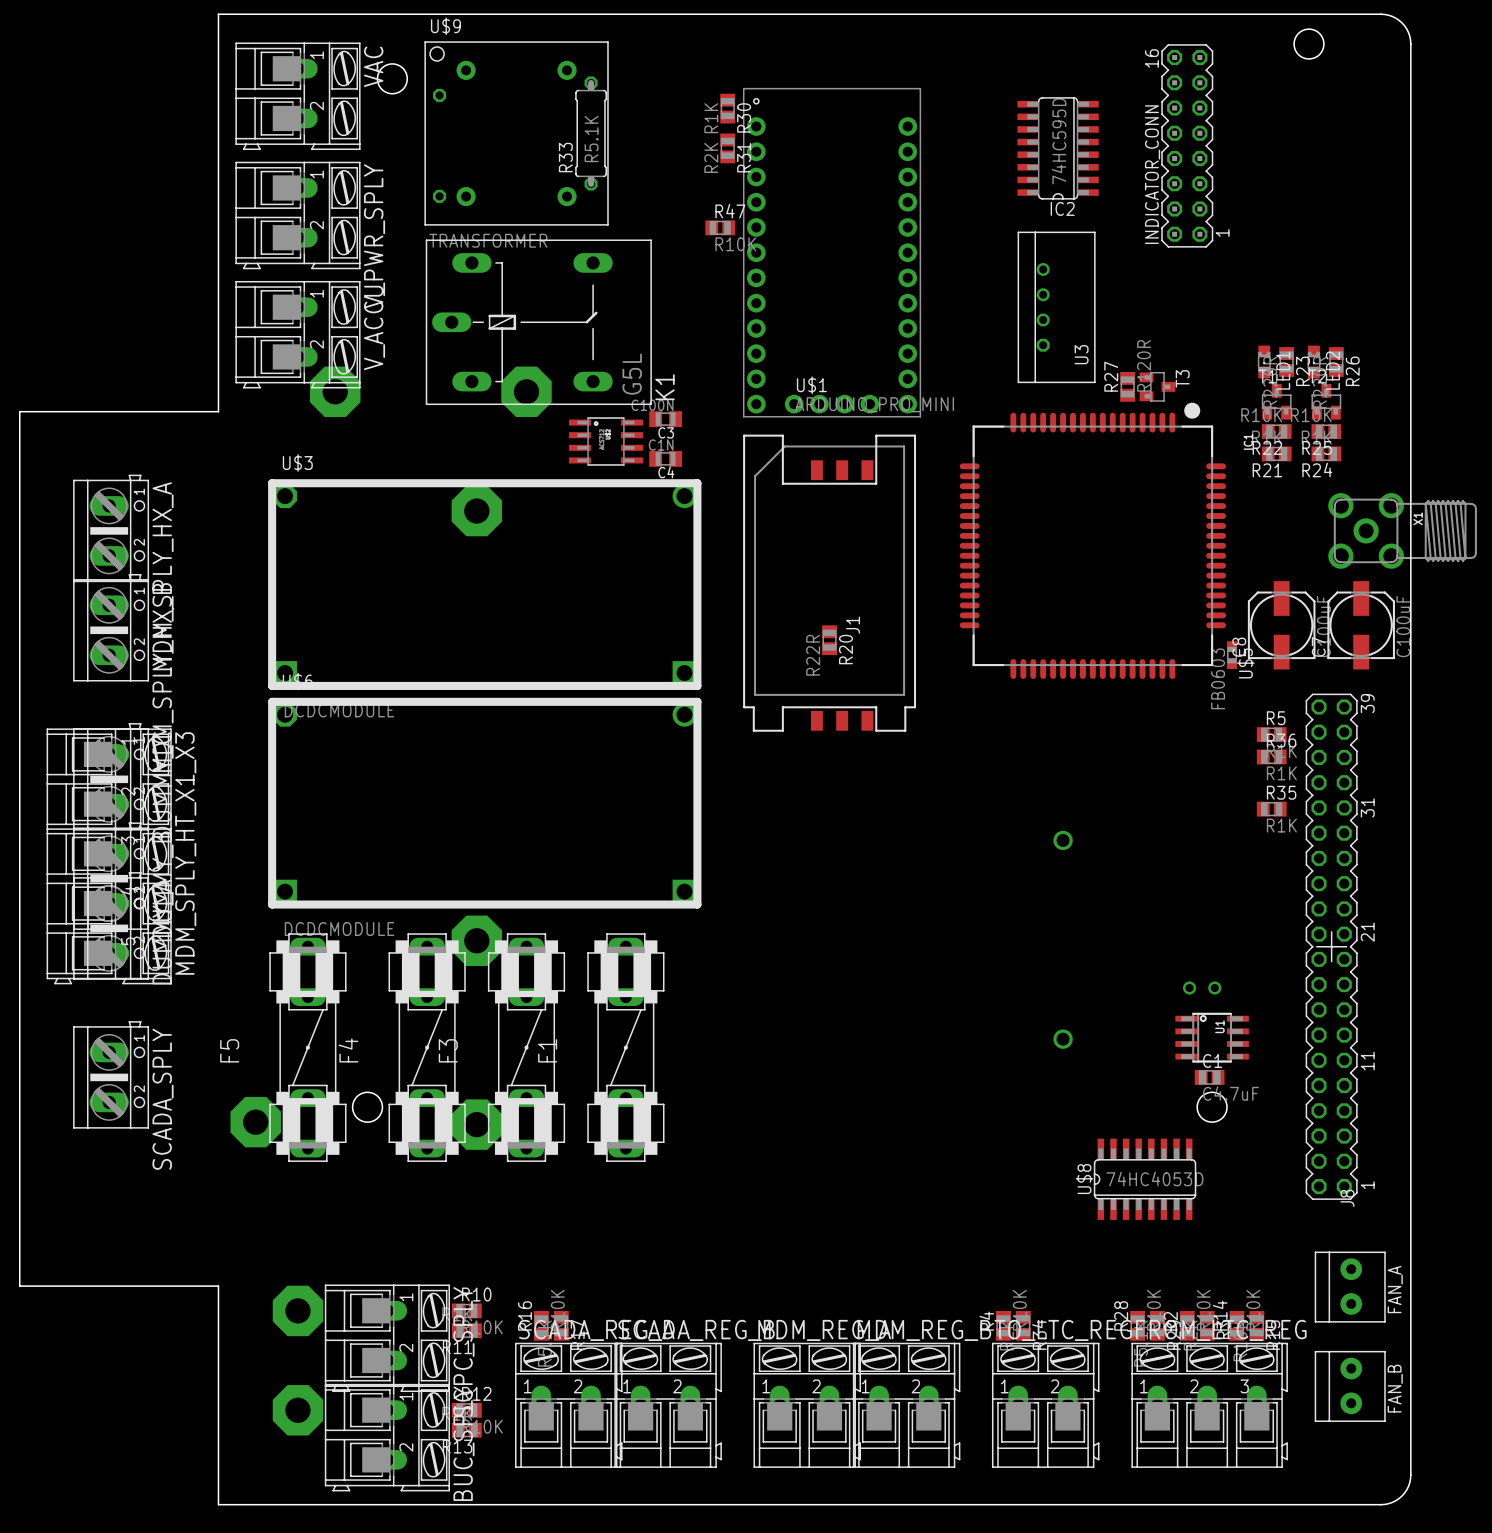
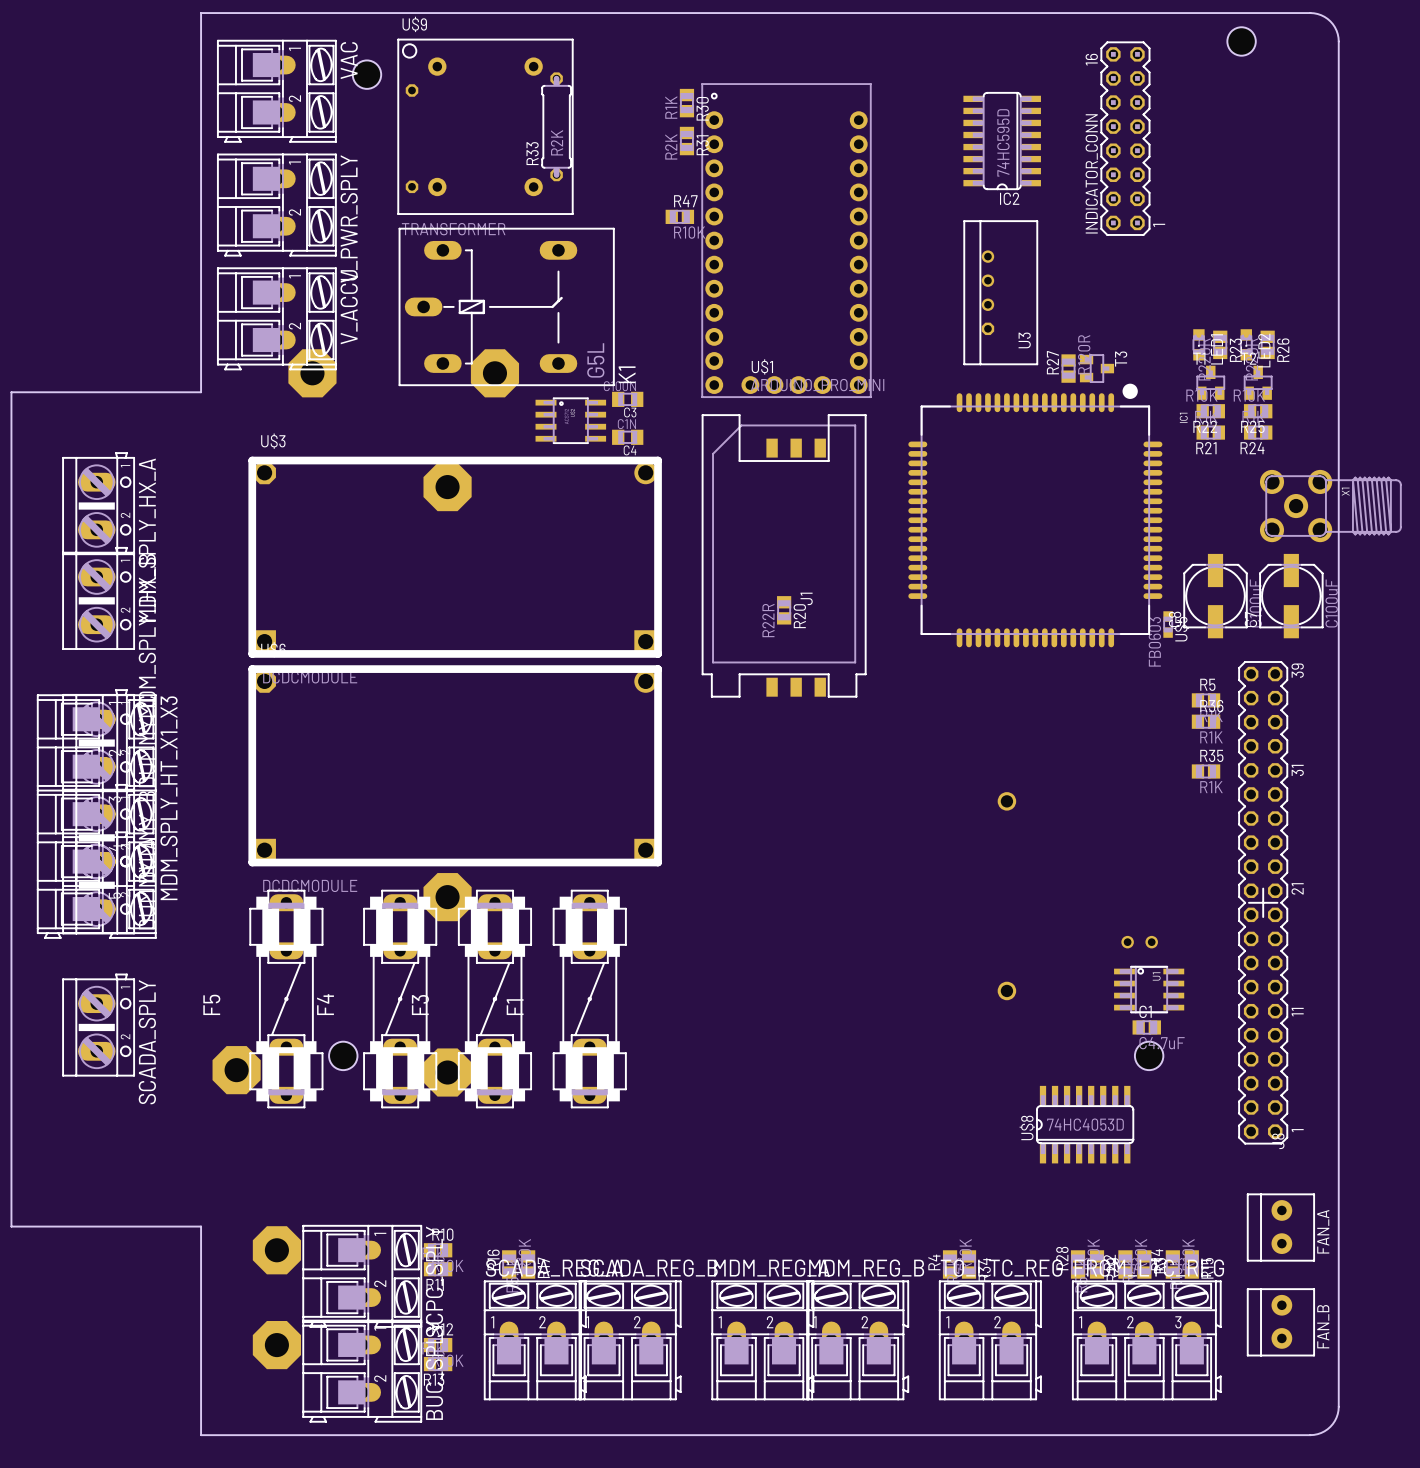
R33 value: R5.1K (591, 139) -> R2K (557, 142)

